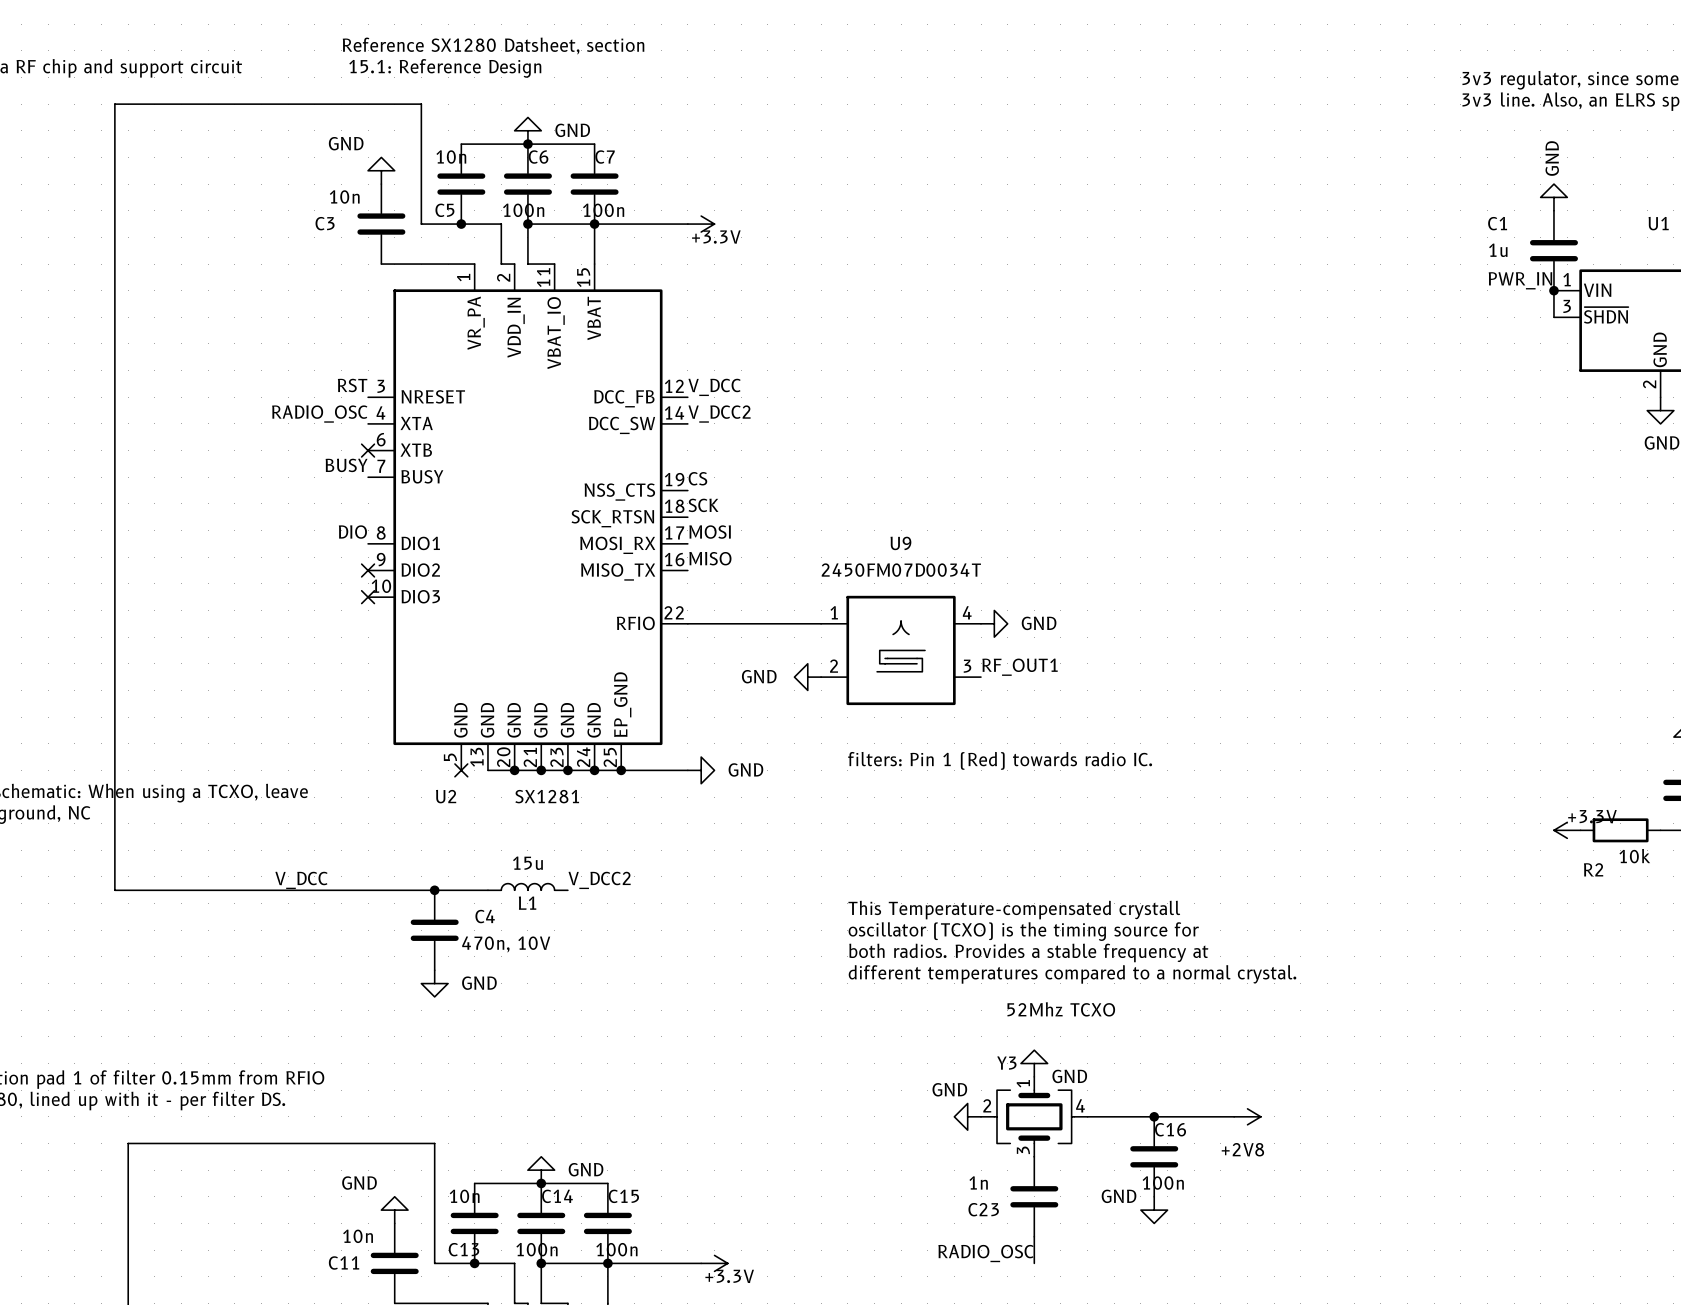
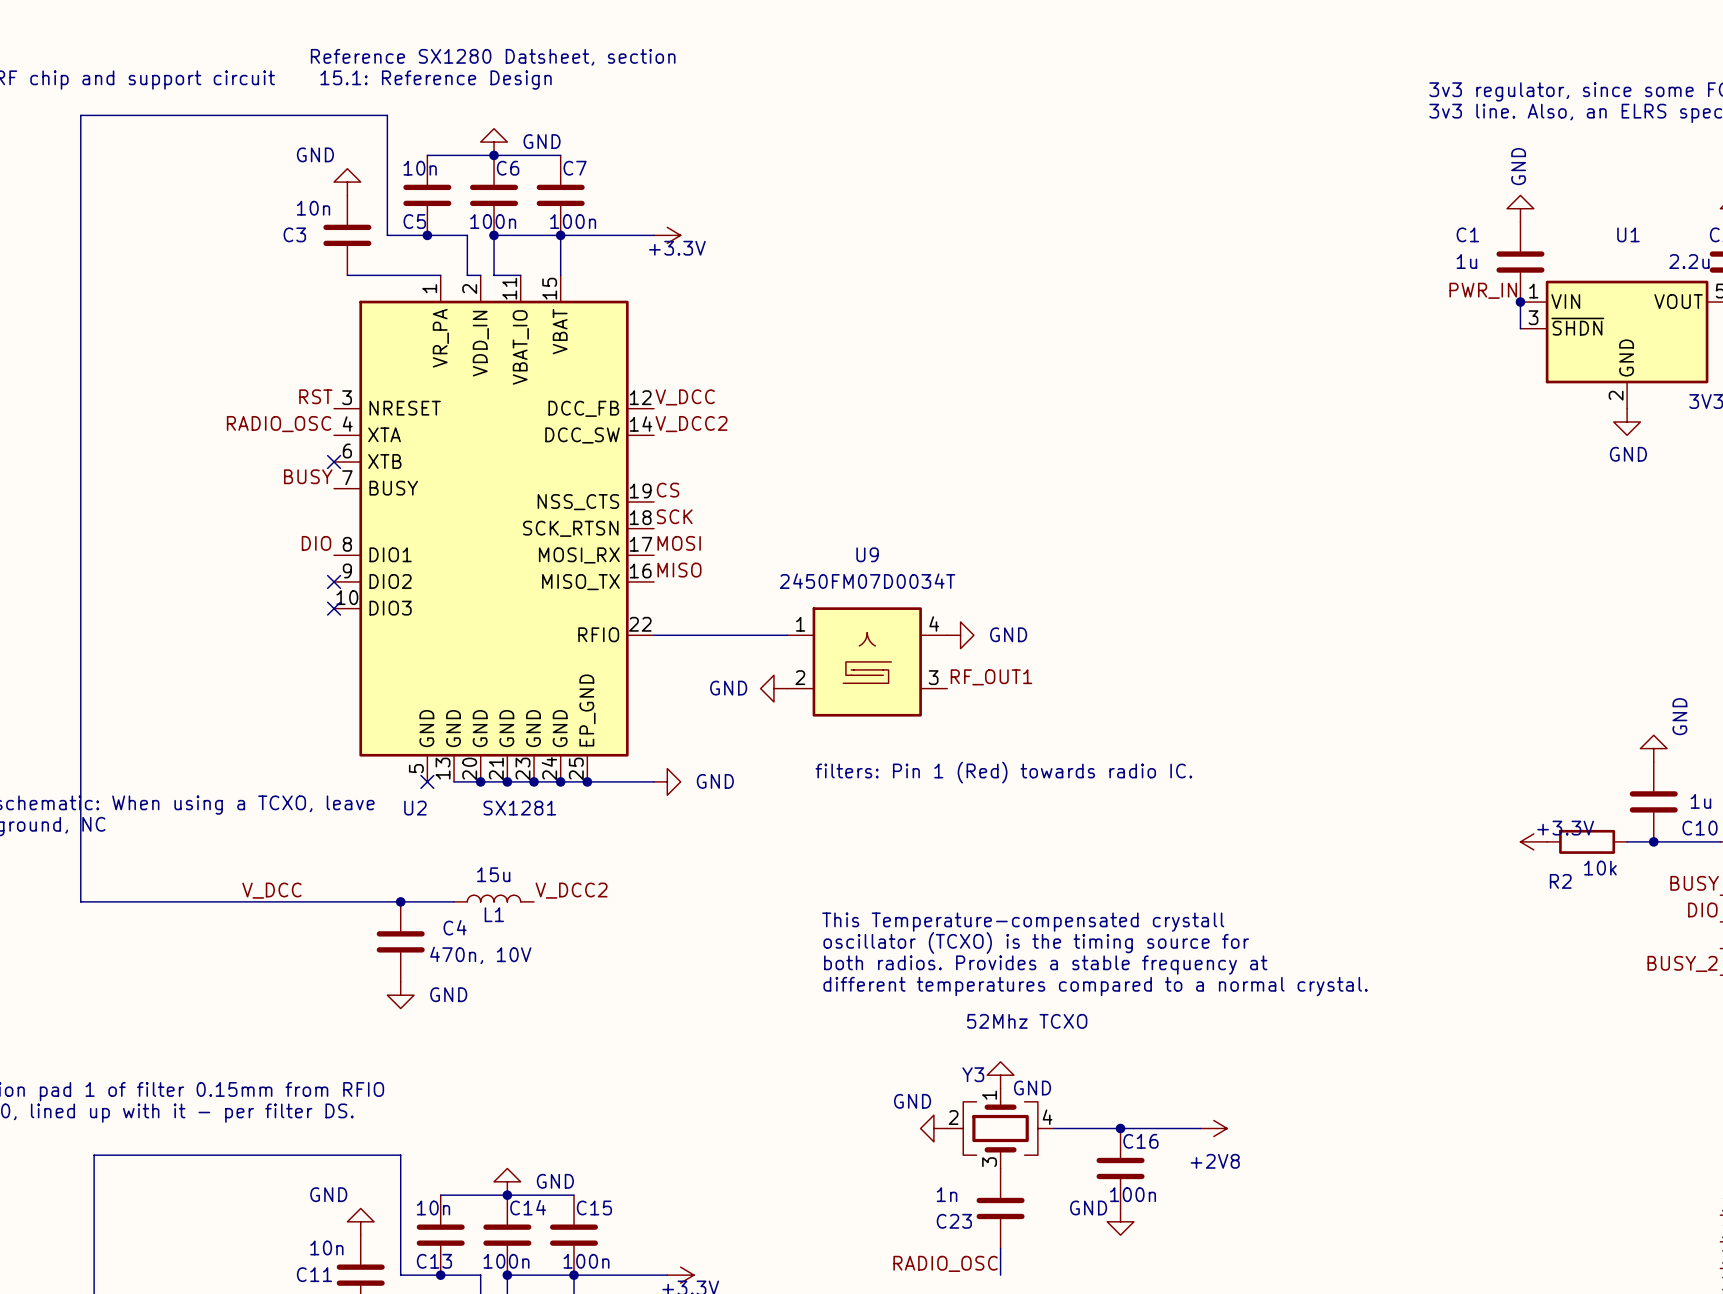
text position: This Temperature-compensated crystall (1014, 910) -> This Temperature-compensated crystall (1023, 922)
text position: oscillator (TCXO) is the timing source for (1023, 931) -> oscillator (TCXO) is the timing source for (1036, 942)
text position: both radios. Provides a stable frequency at (1028, 952) -> both radios. Provides a stable frequency at (1045, 965)
text position: different temperatures compared to a normal crystal. (1072, 974) -> different temperatures compared to a normal crystal. (1095, 986)

